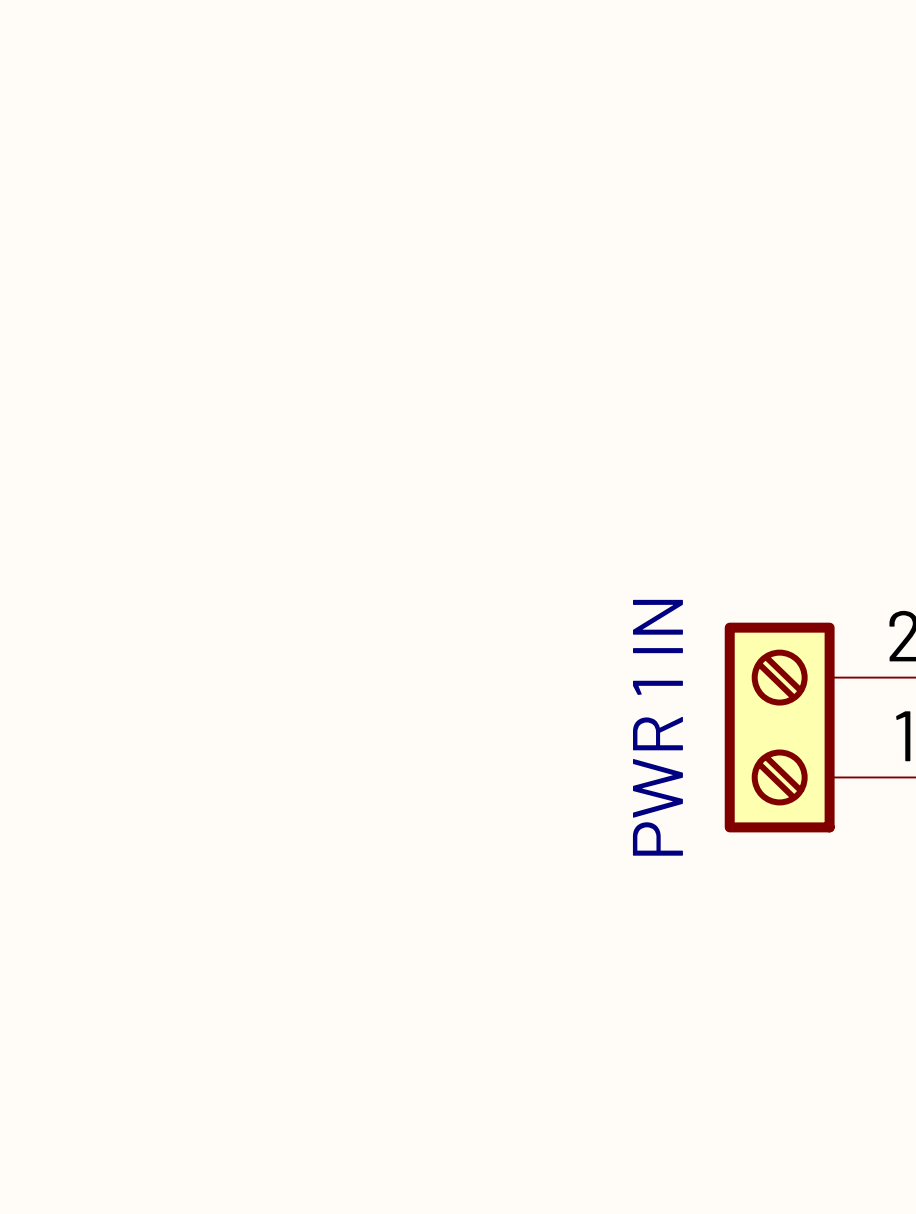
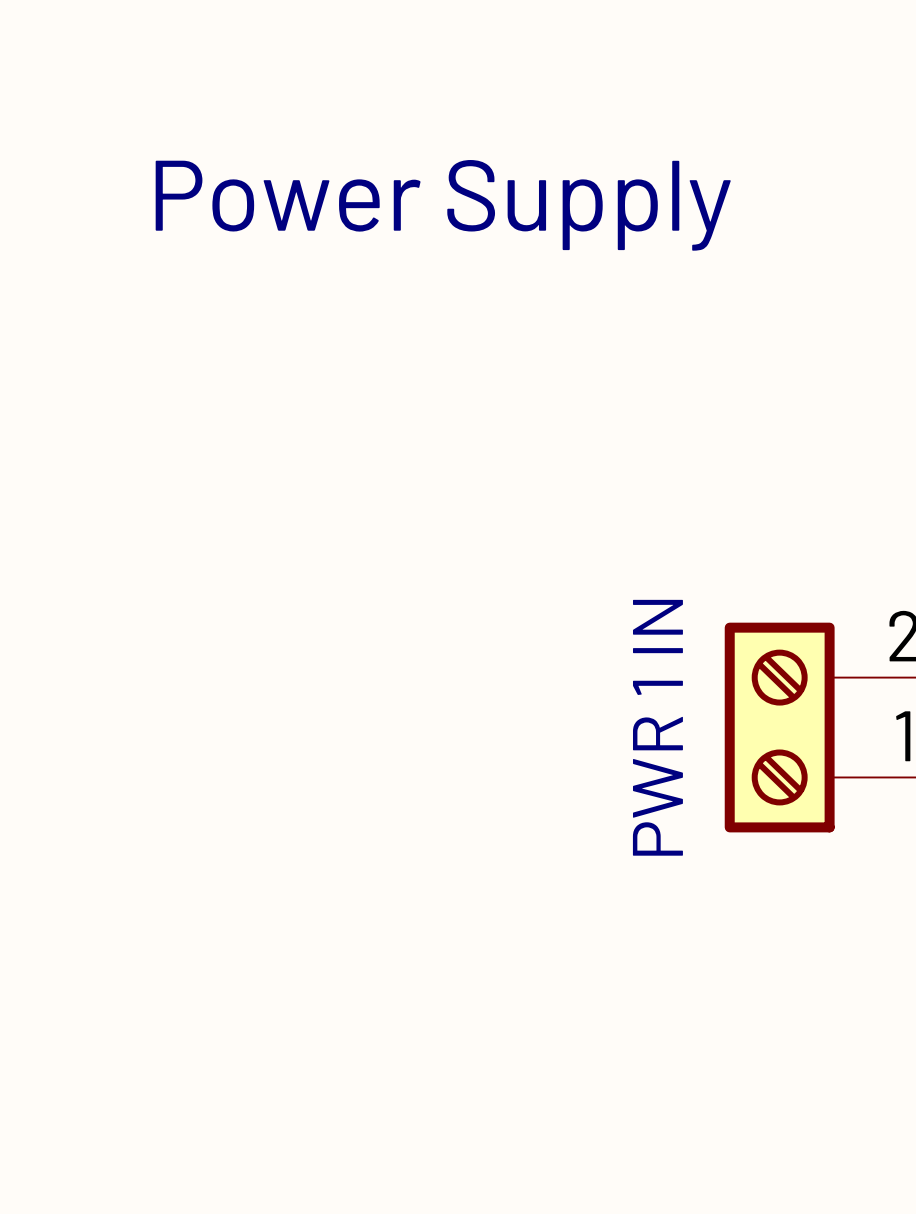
text: none -> Power Supply (443, 205)

